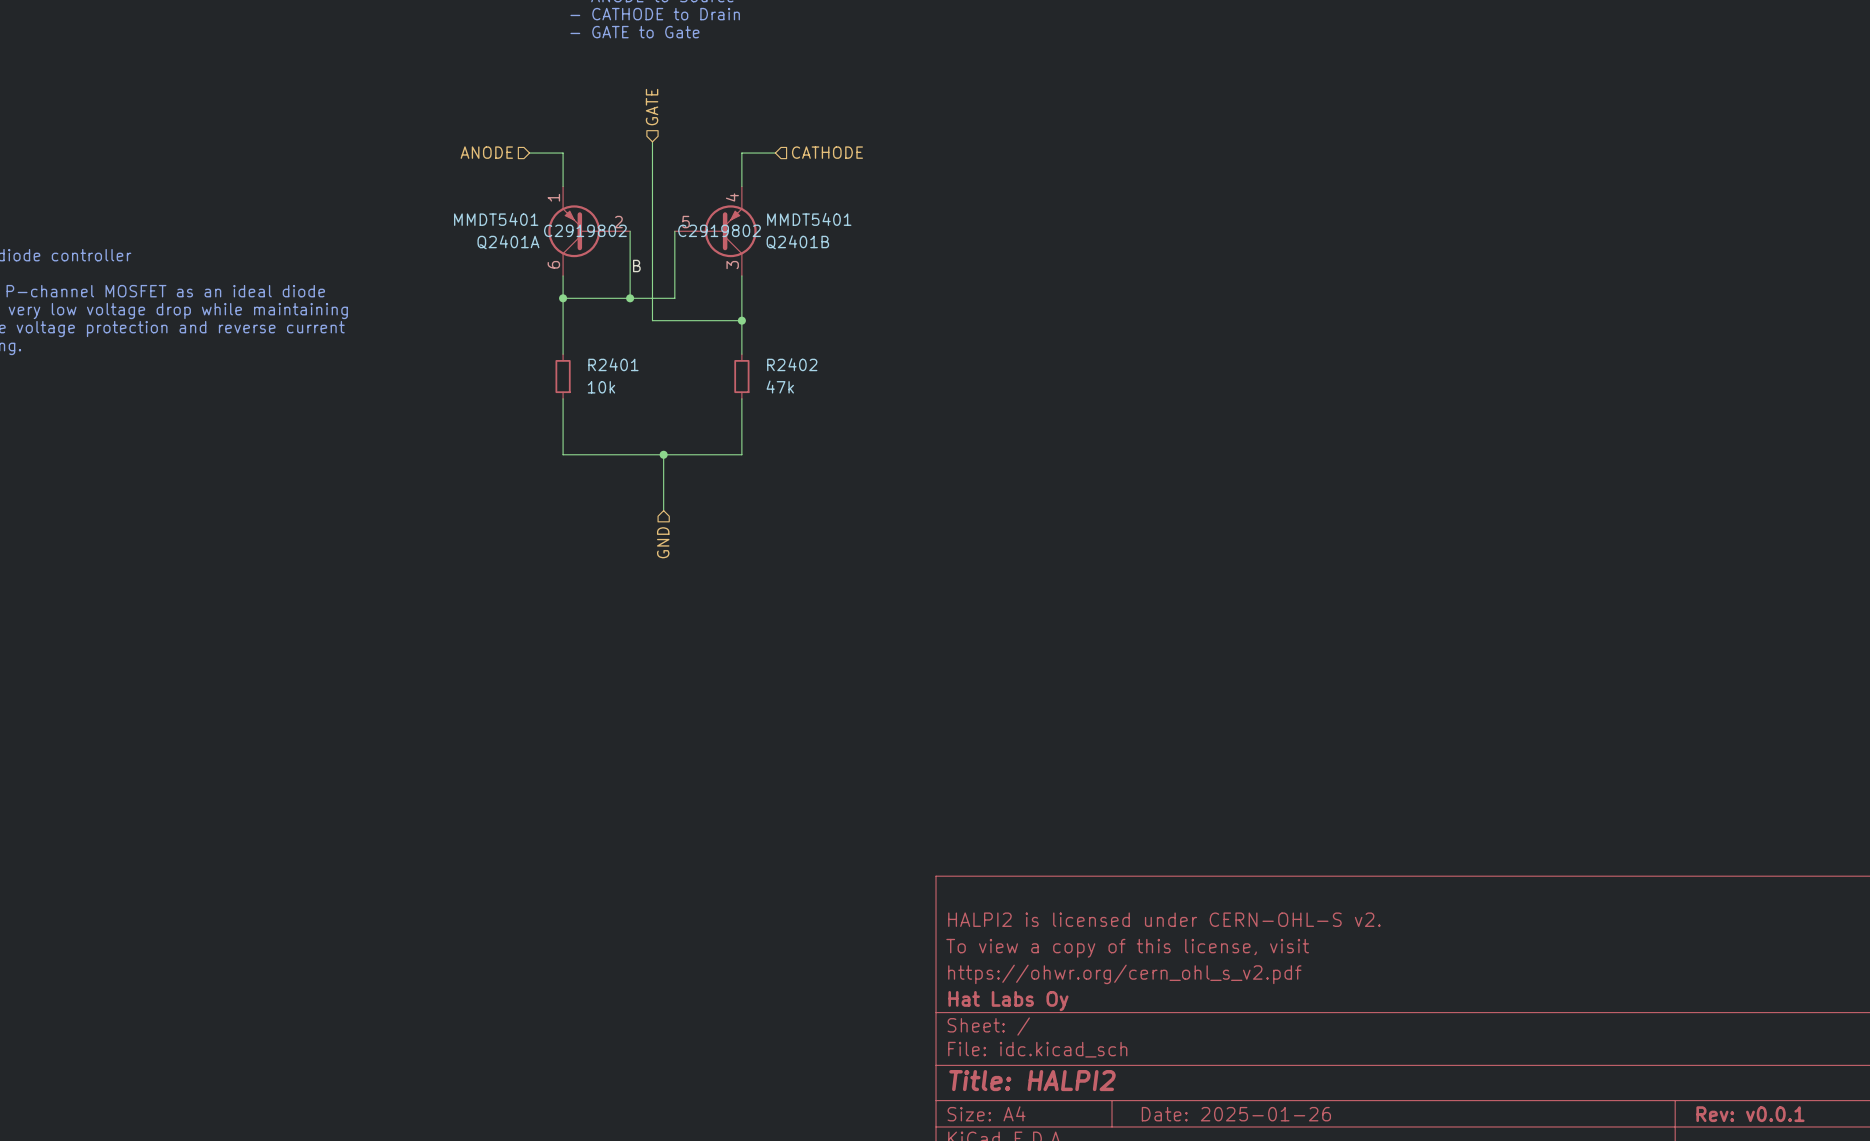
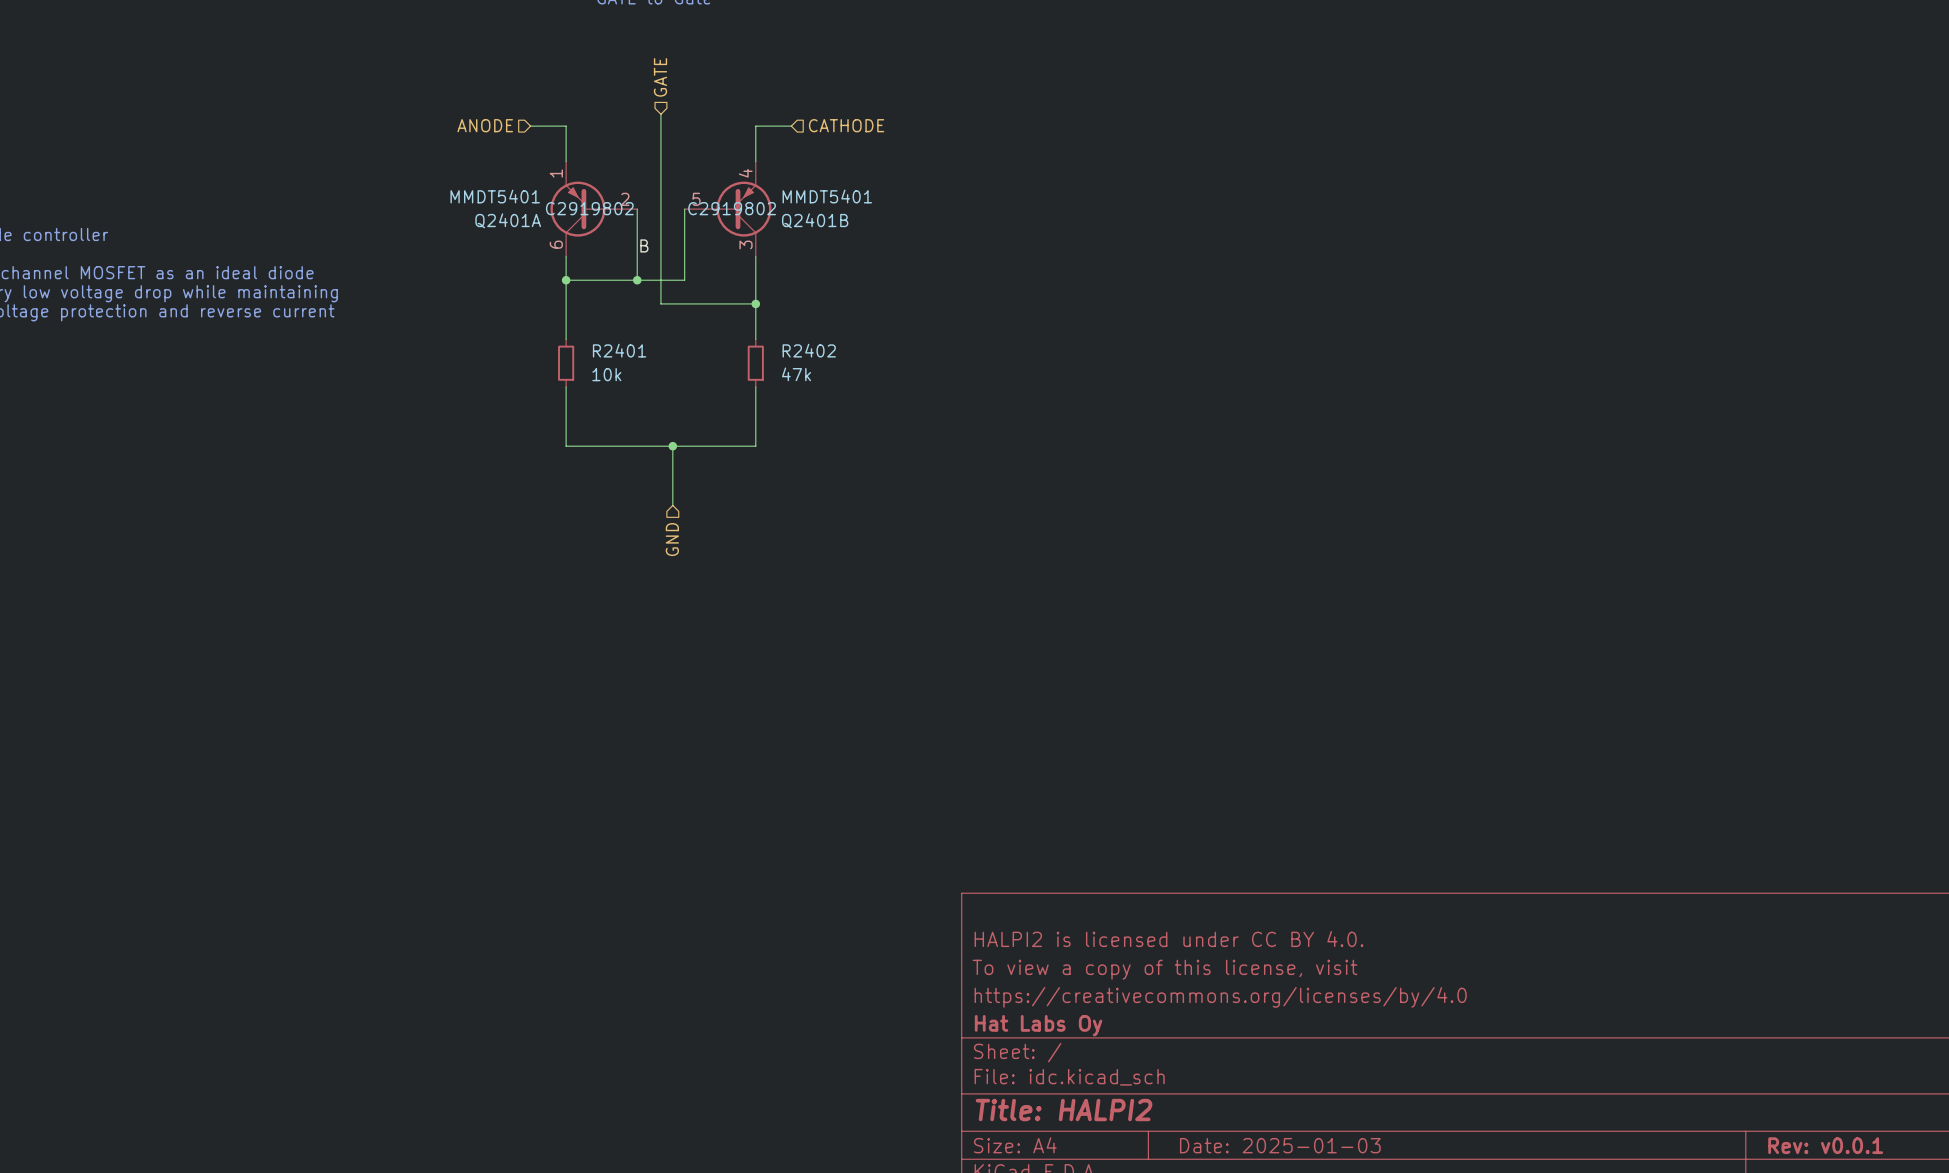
title block: HALPI2 is licensed under CERN-OHL-S v2. (1164, 919) -> HALPI2 is licensed under CC BY 4.0. (1169, 939)
title block: https://ohwr.org/cern_ohl_s_v2.pdf (1124, 974) -> https://creativecommons.org/licenses/by/4.0 (1220, 997)
title block: Date: 2025-01-26 (1236, 1114) -> Date: 2025-01-03 (1280, 1145)

